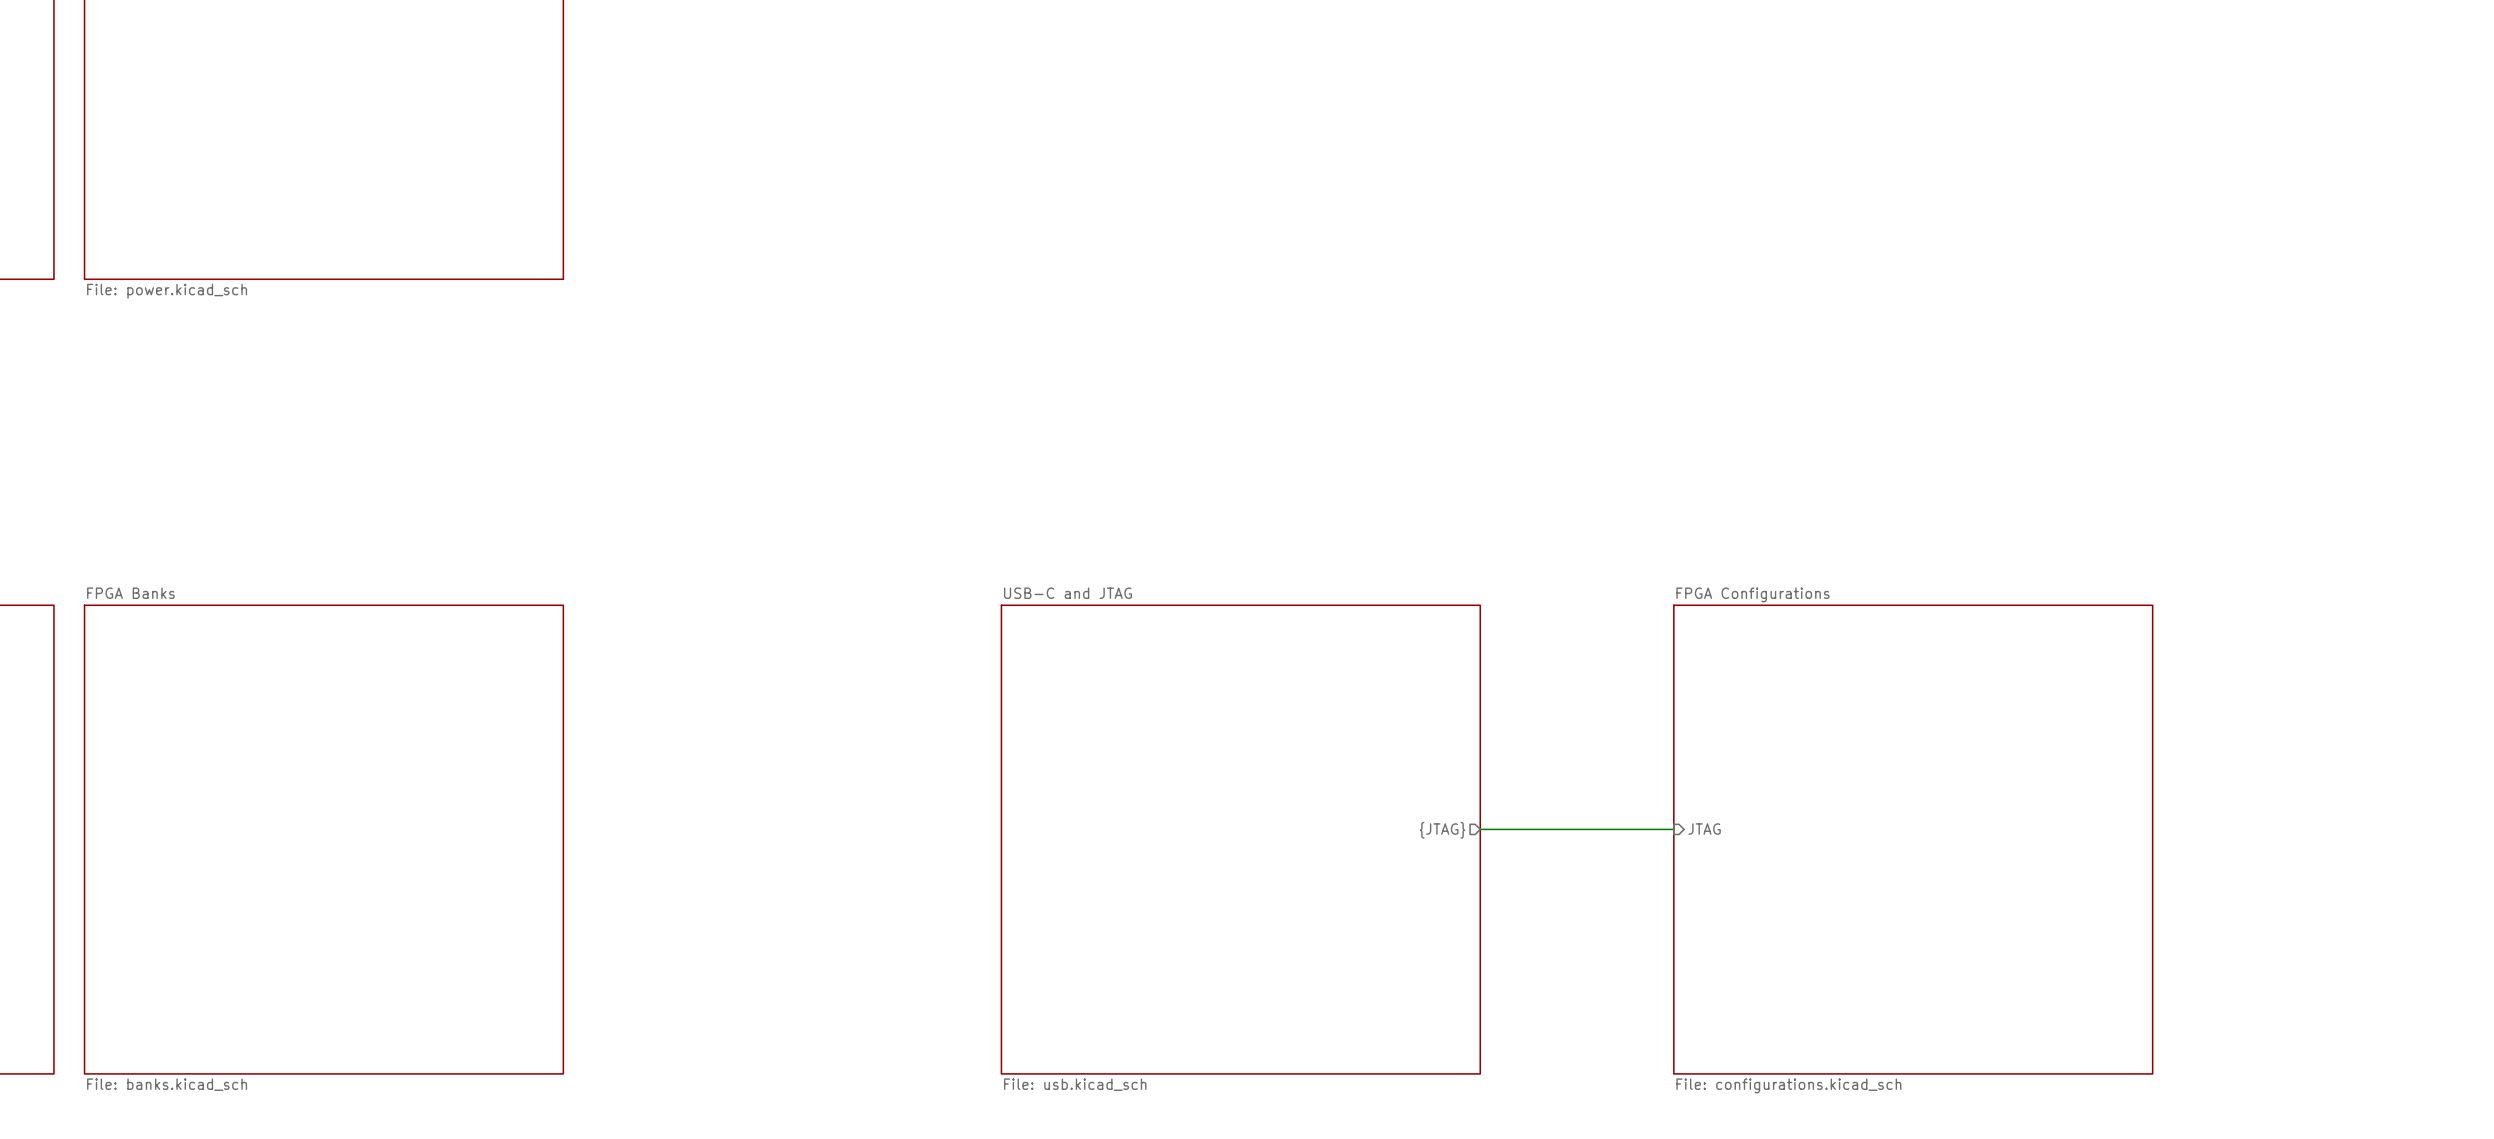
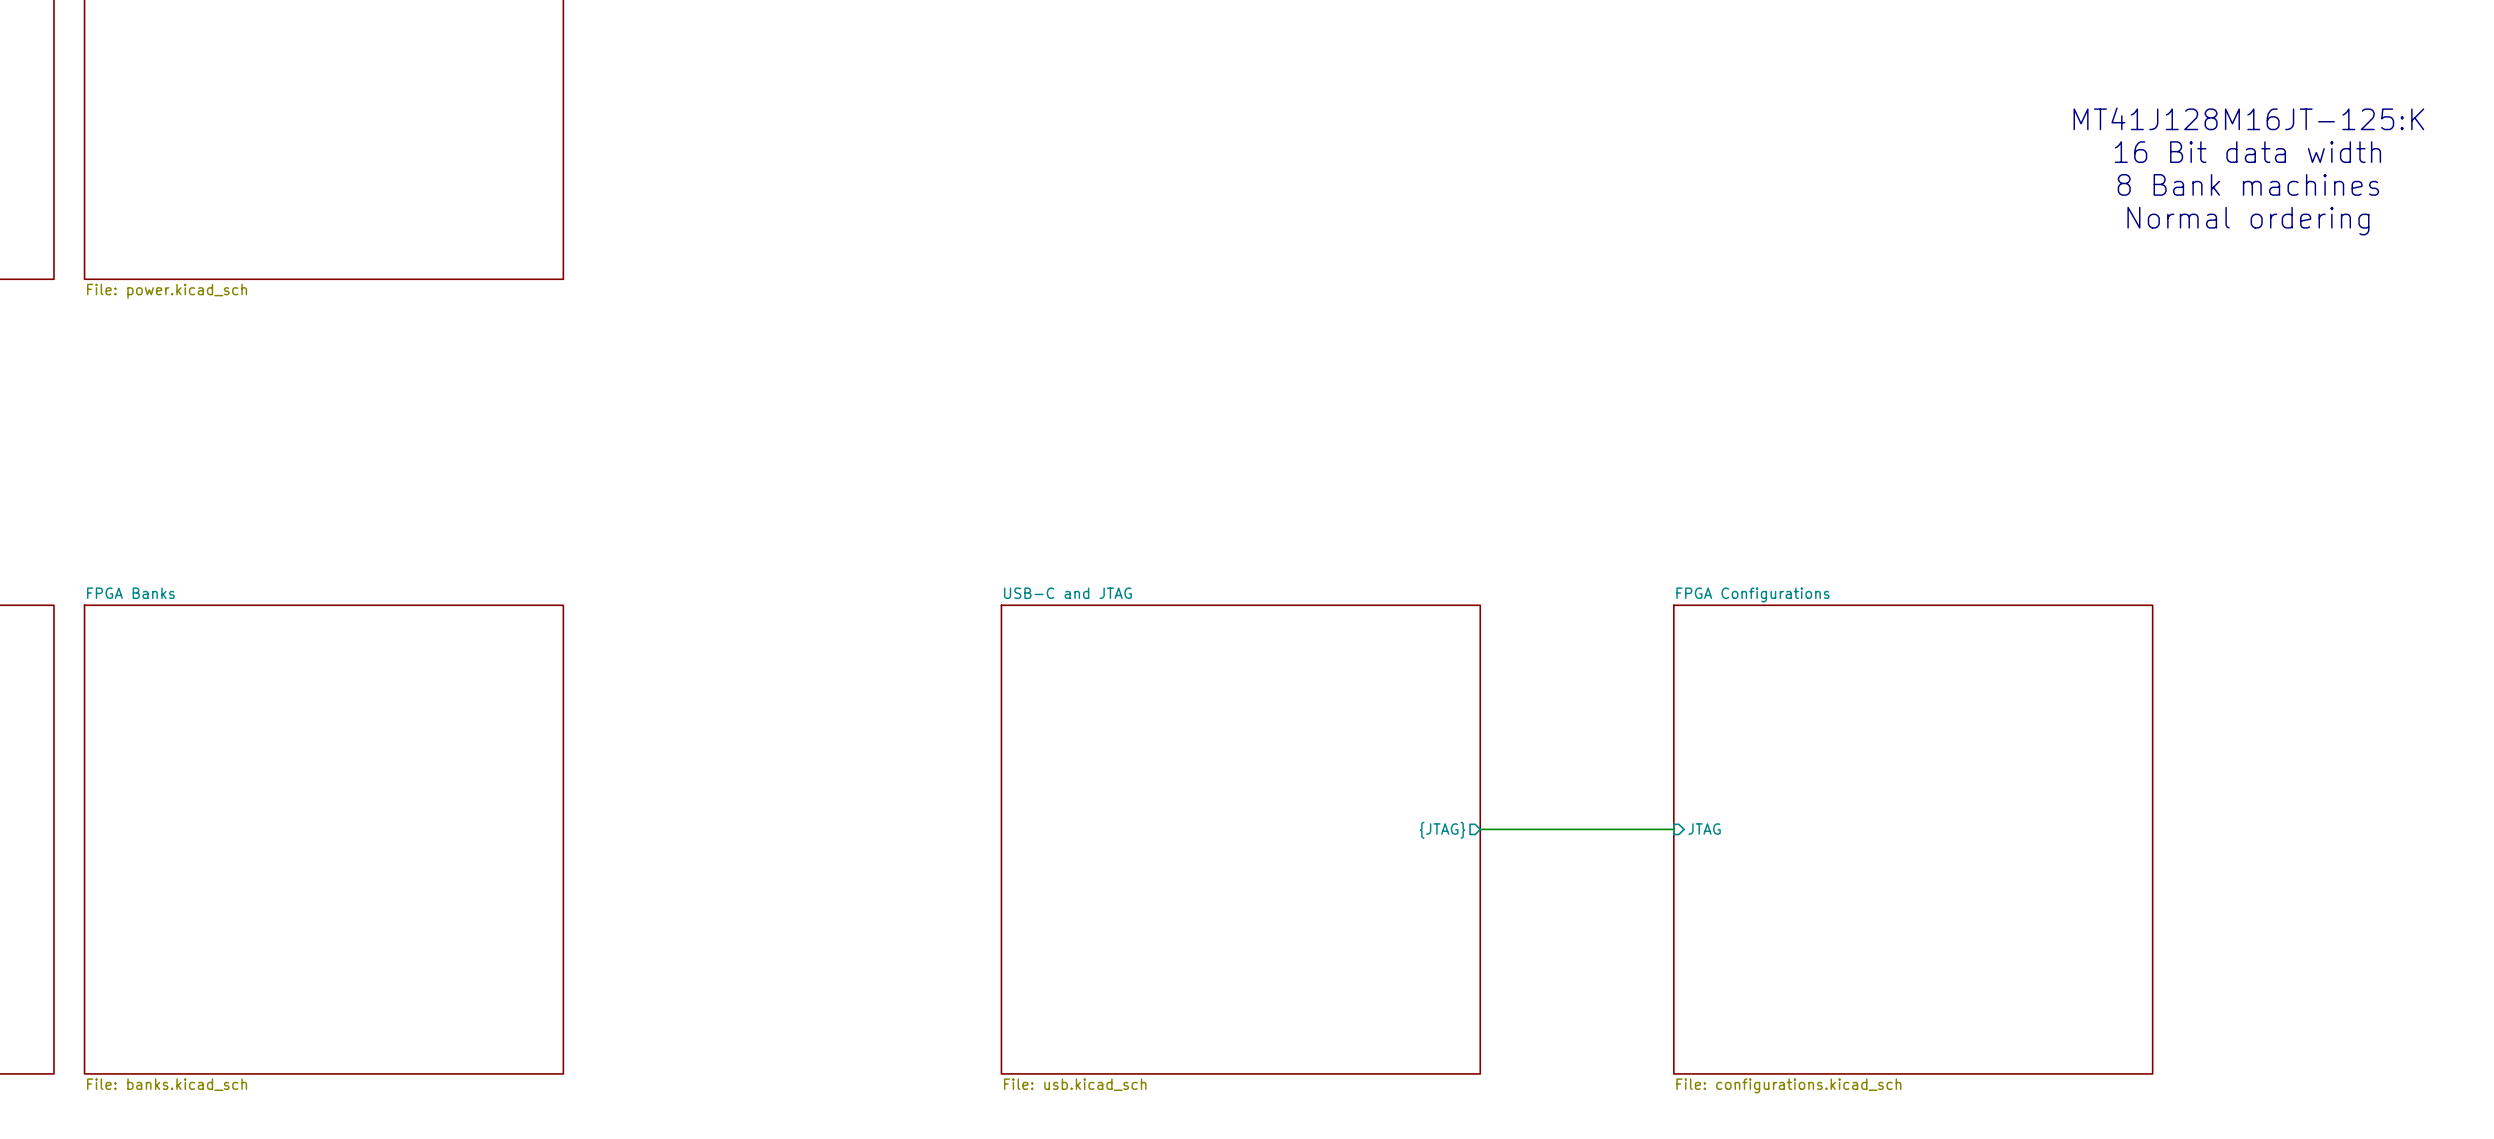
text: none -> MT41J128M16JT-125:K (2248, 118)
text: none -> 16 Bit data width (2247, 152)
text: none -> 8 Bank machines (2248, 184)
text: none -> Normal ordering (2248, 221)

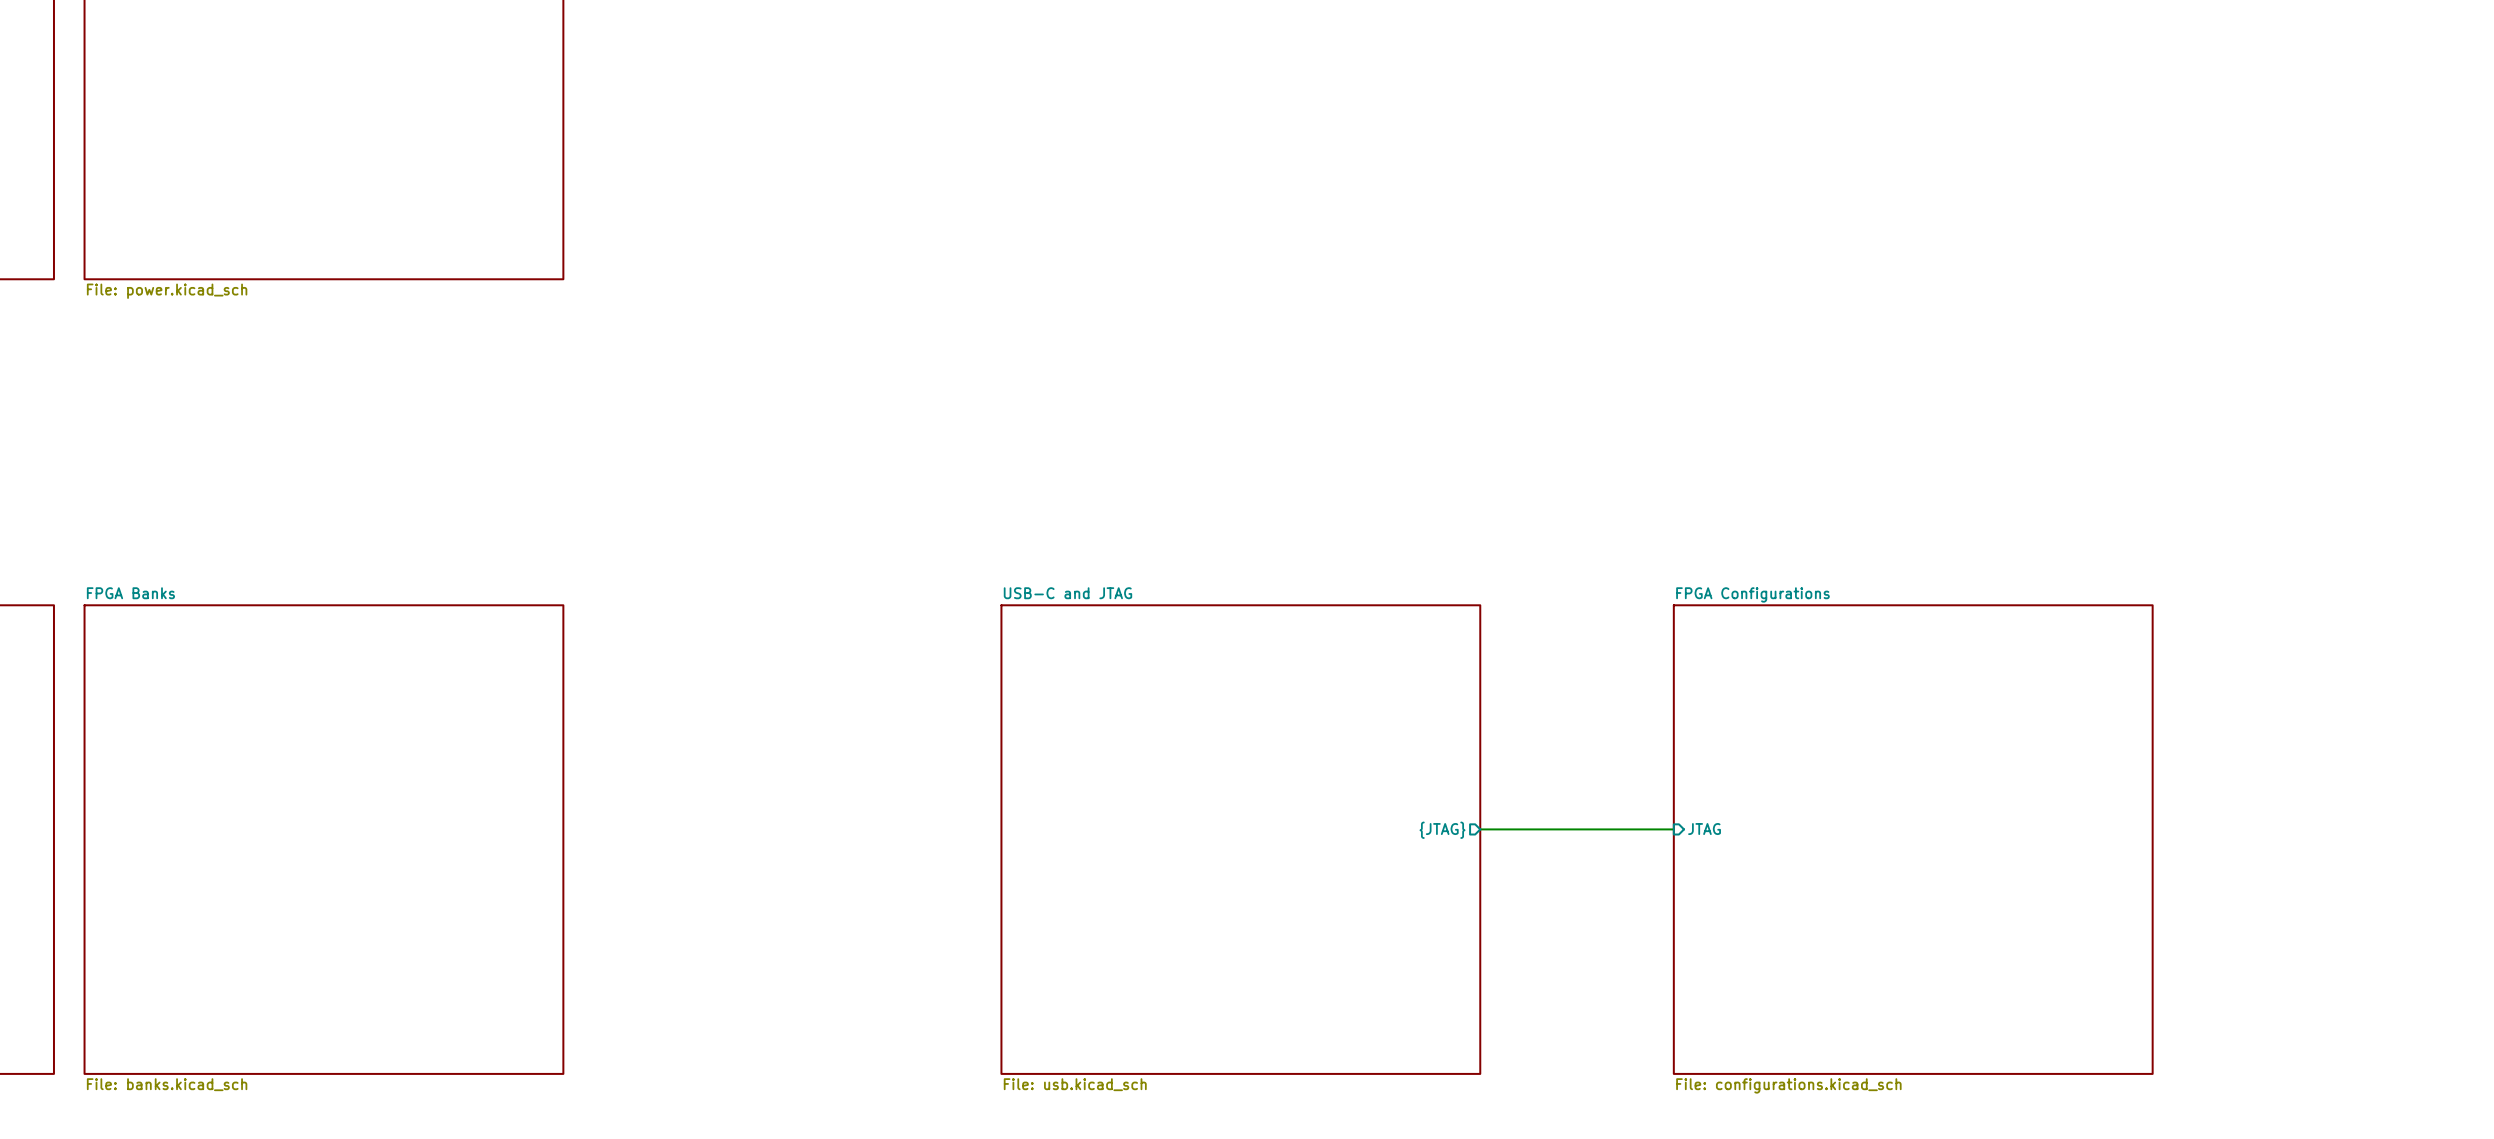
text: MT41J128M16JT-125:K (2248, 118) -> none
text: 16 Bit data width (2247, 152) -> none
text: 8 Bank machines (2248, 184) -> none
text: Normal ordering (2248, 221) -> none

